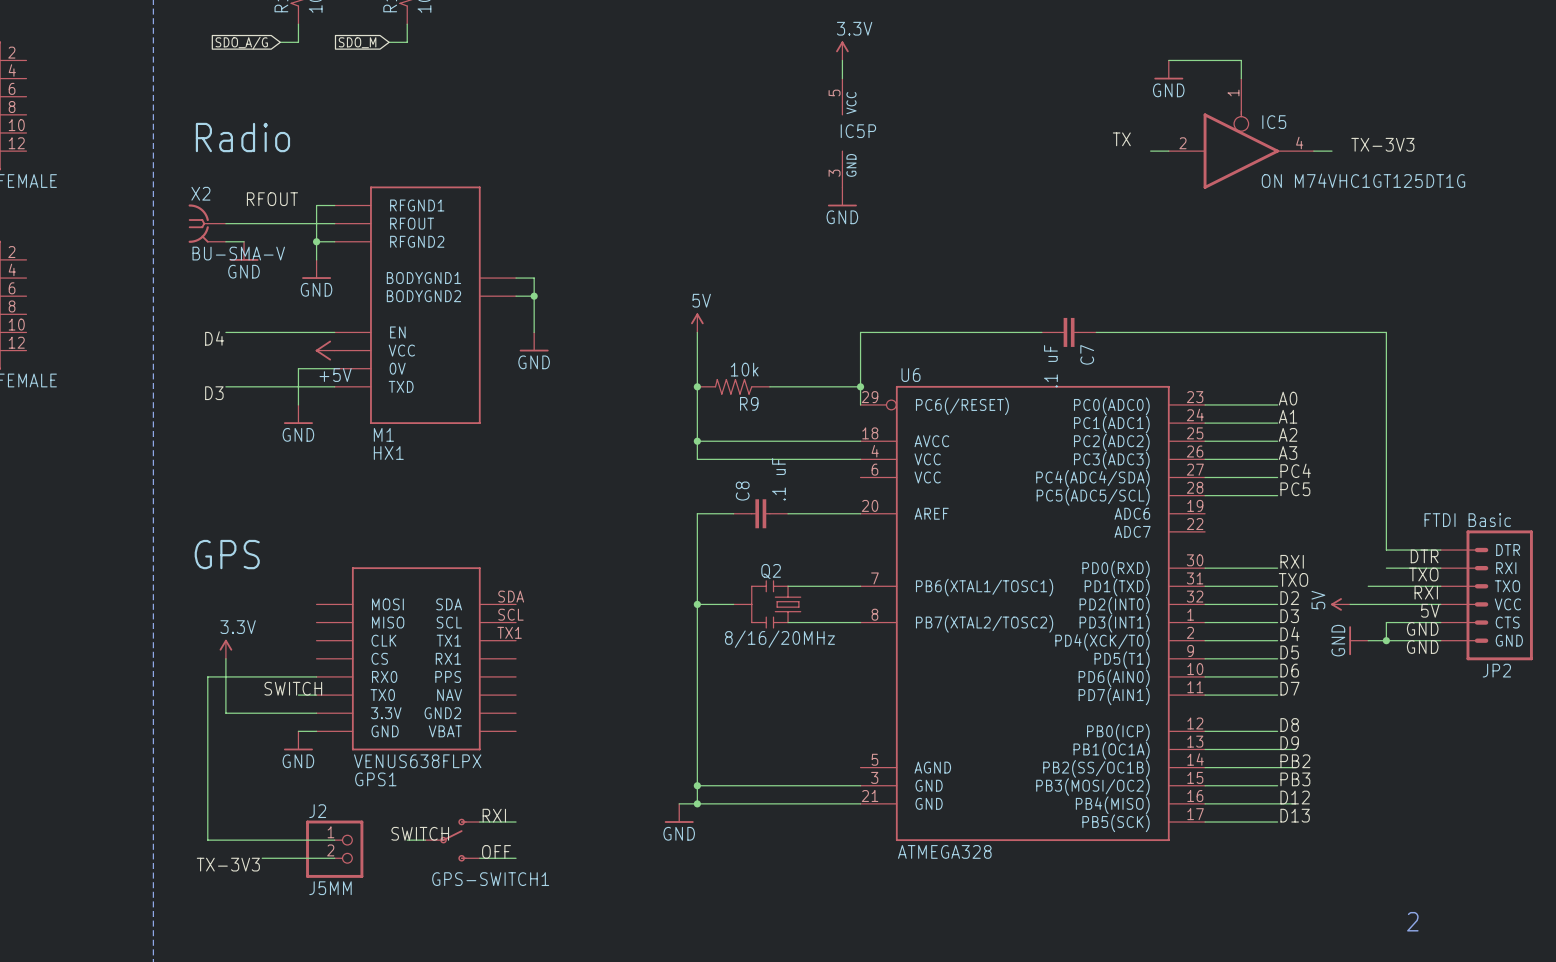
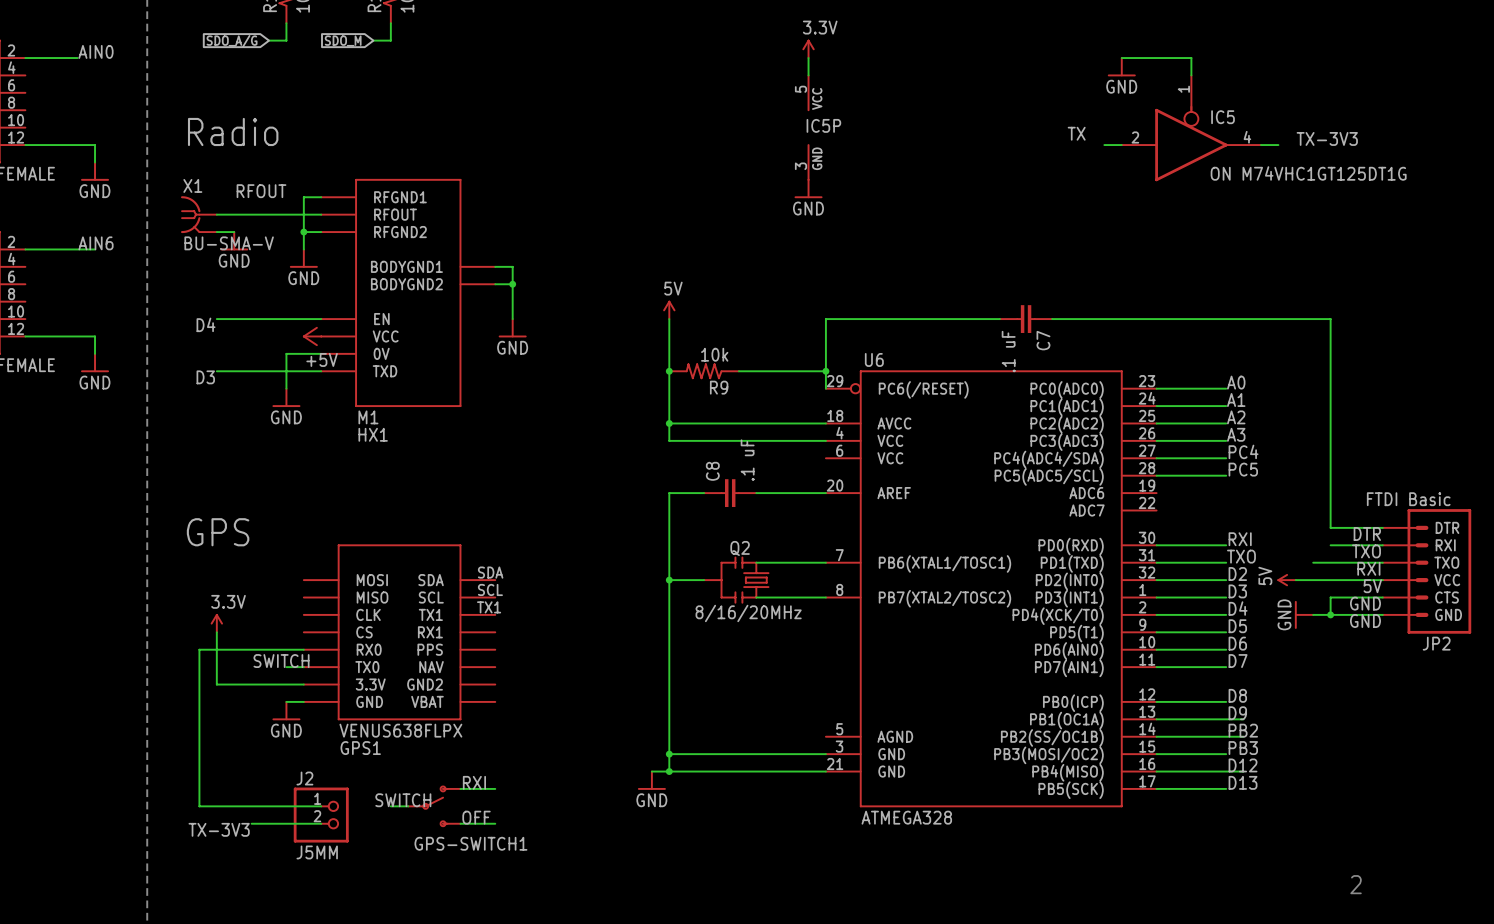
label: none -> AIN0 (96, 51)
wire: none -> (25, 58) (77, 58)
wire: none -> (25, 145) (95, 145) (95, 162)
power symbol: none -> GND (95, 171)
X2 name: X2 (200, 193) -> X1 (192, 185)
label: none -> AIN6 (96, 243)
wire: none -> (25, 249) (95, 249)
wire: none -> (25, 336) (95, 336) (95, 353)
power symbol: none -> GND (95, 363)

